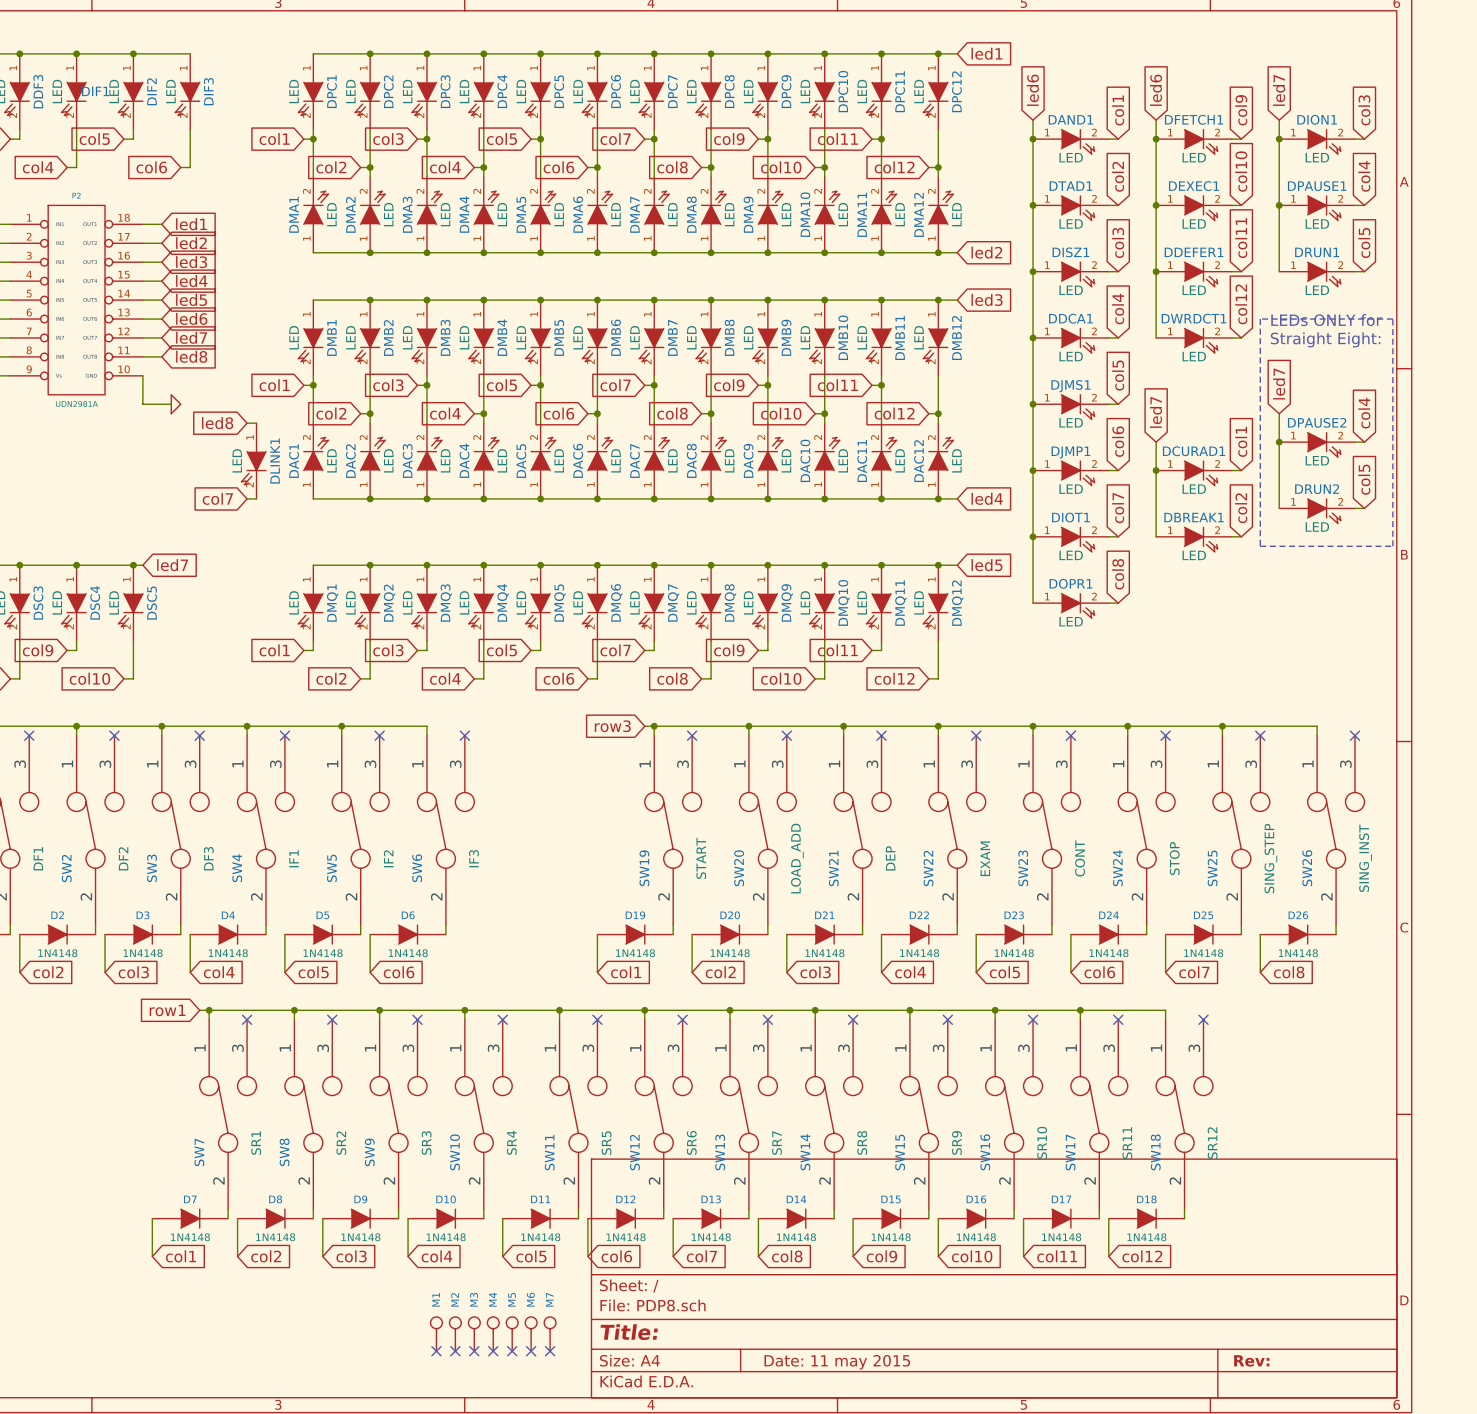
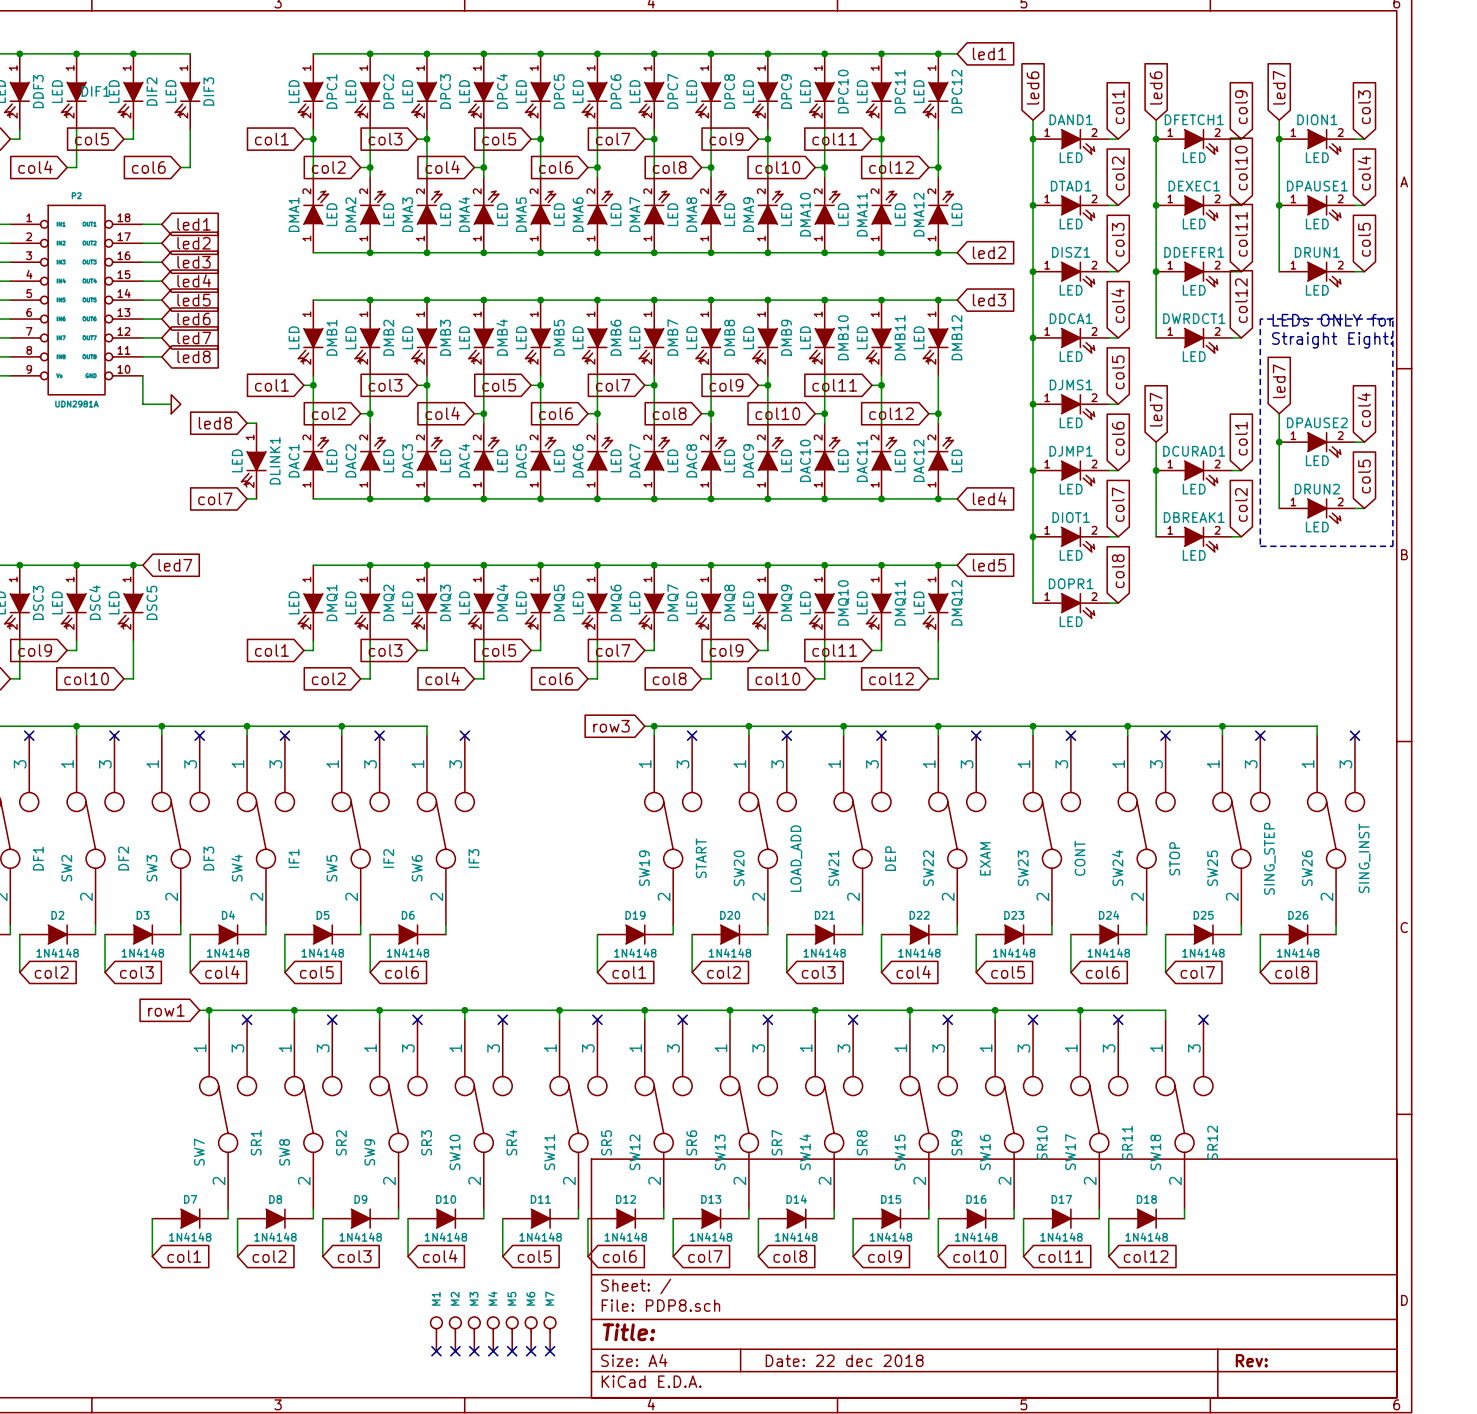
title block: Date: 11 may 2015 (837, 1362) -> Date: 22 dec 2018 (844, 1360)

